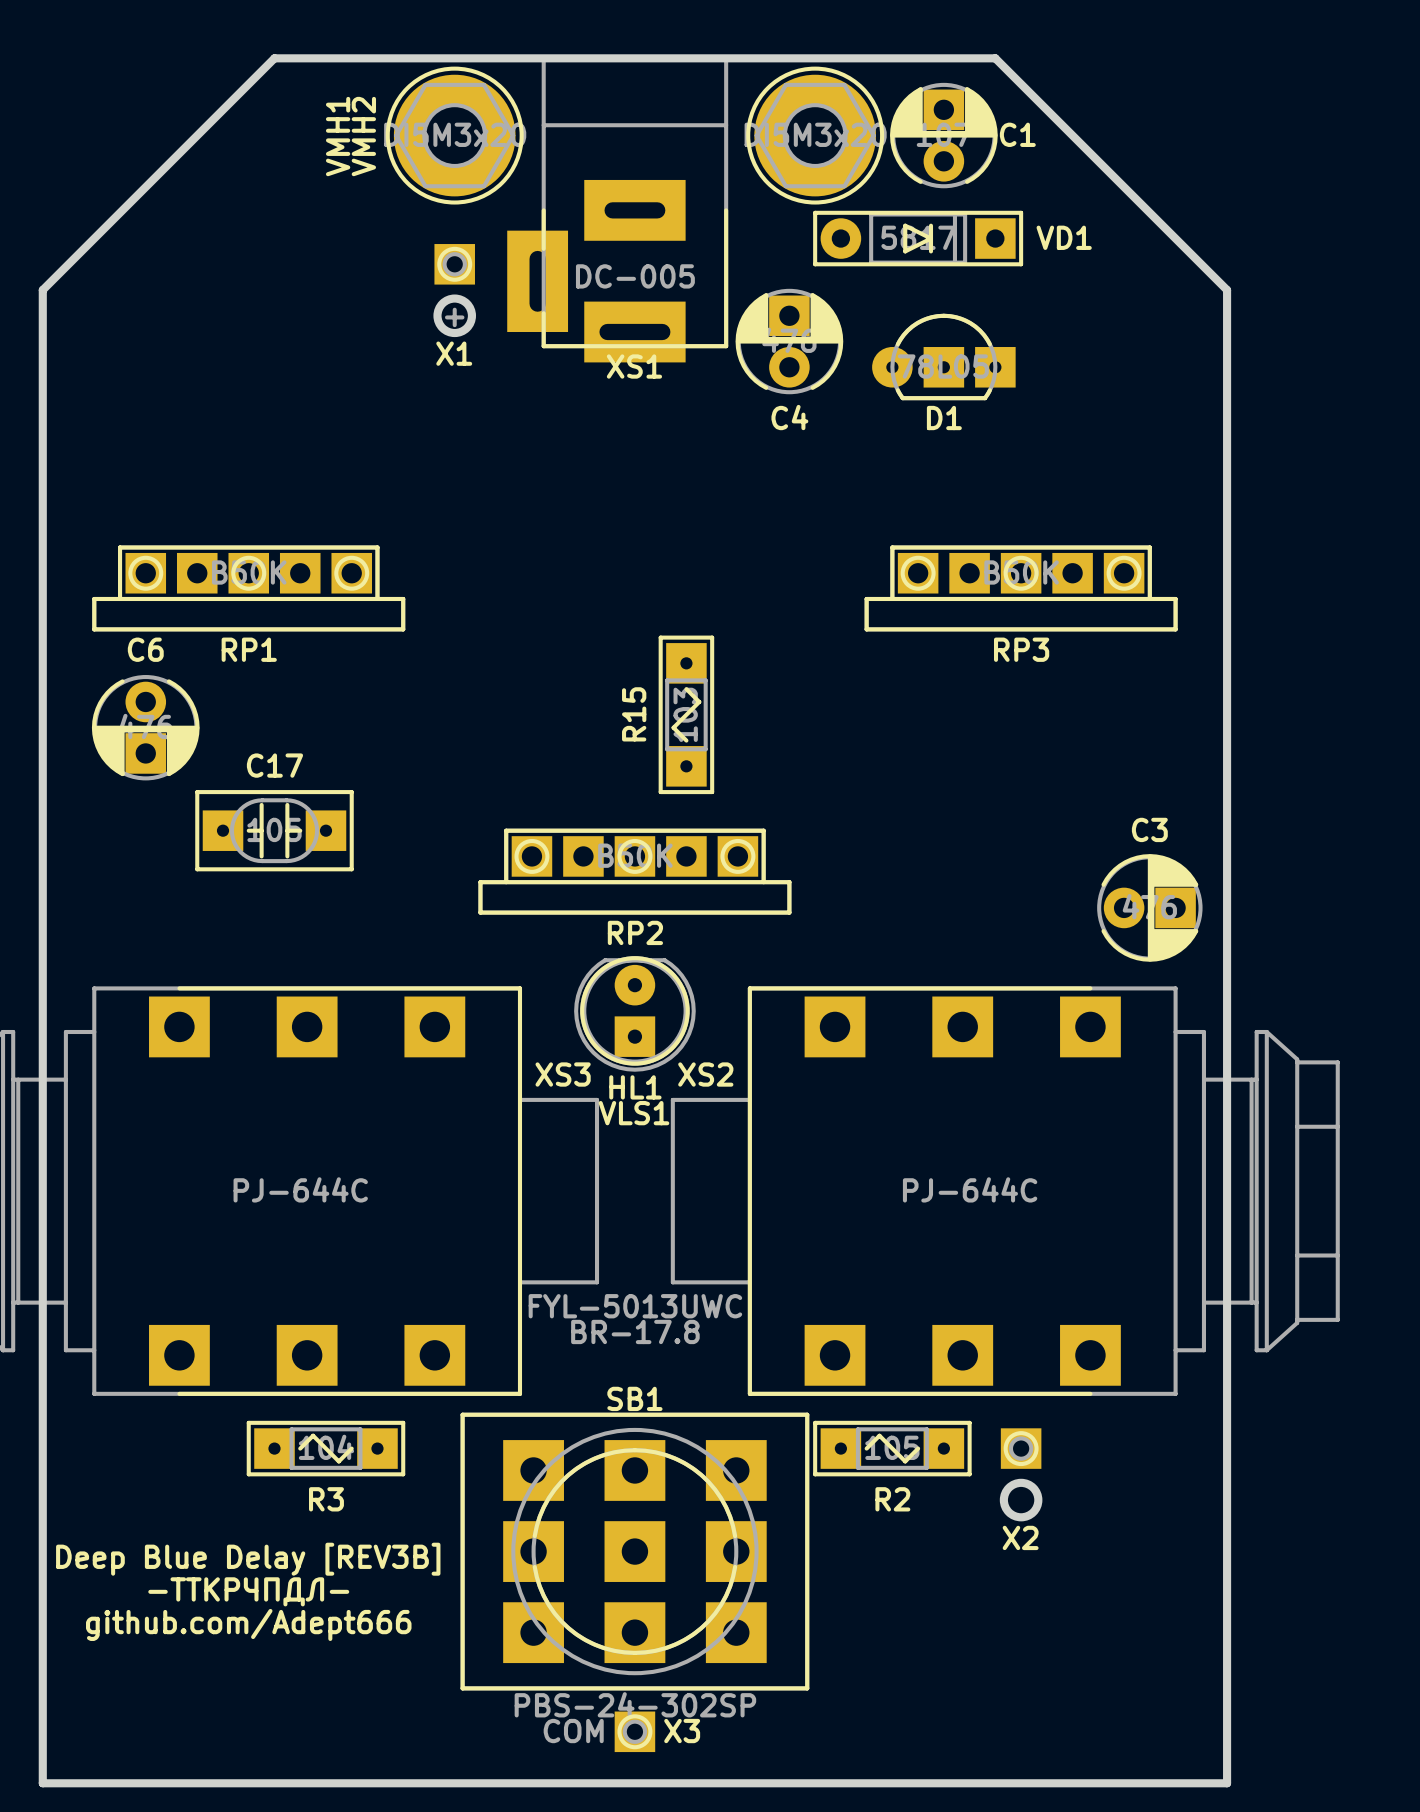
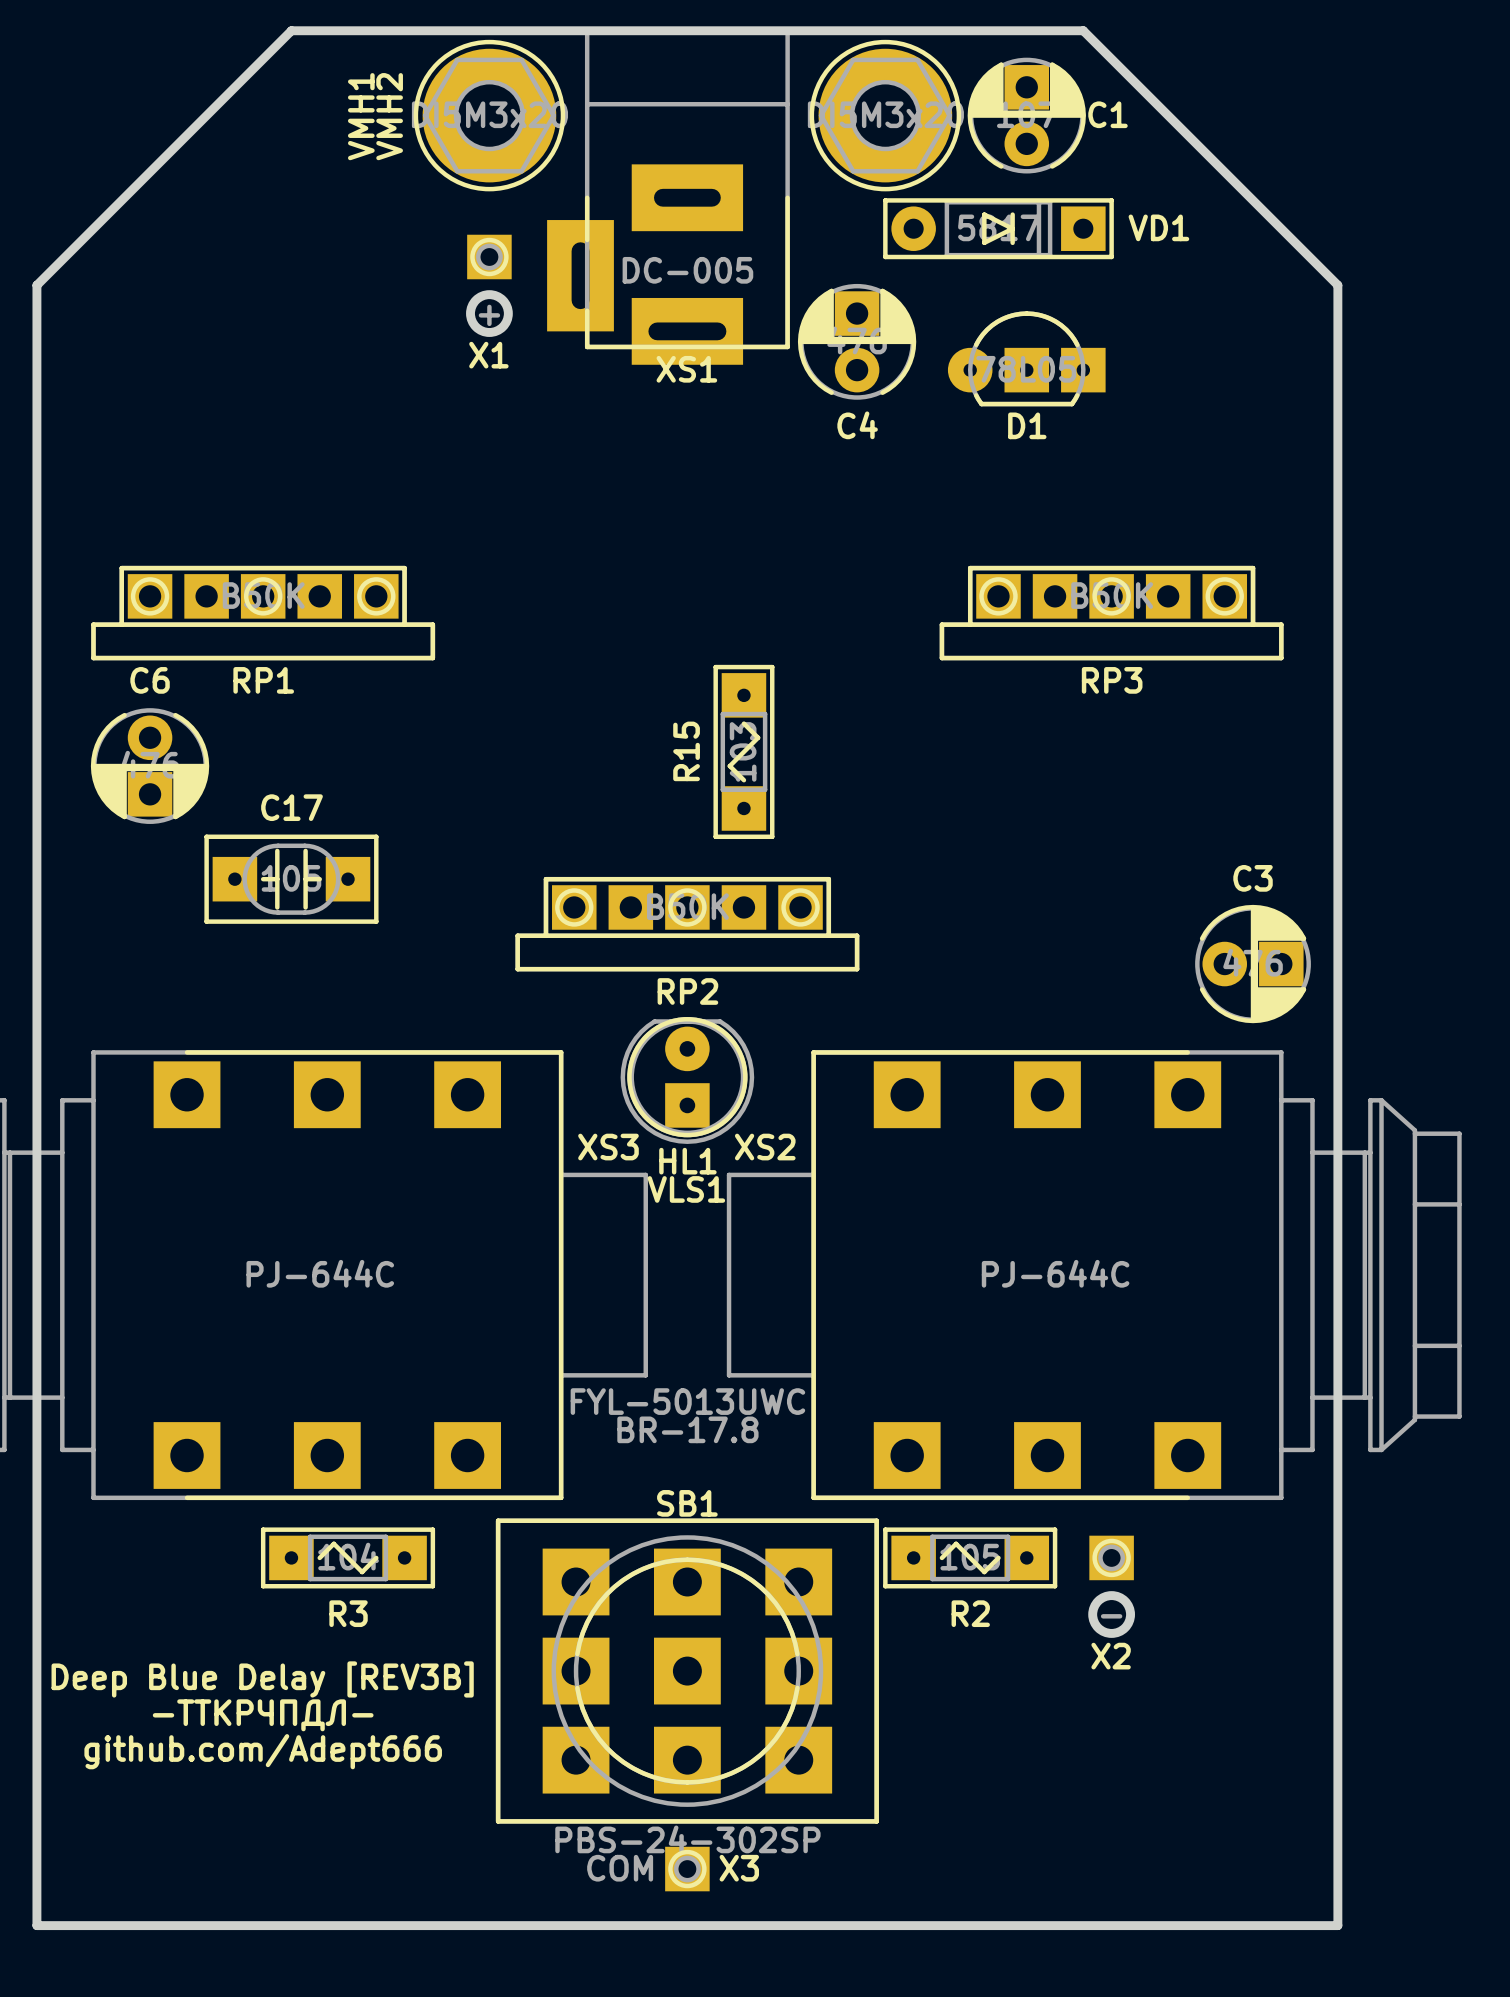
X2 value: none -> - (1111, 1616)

